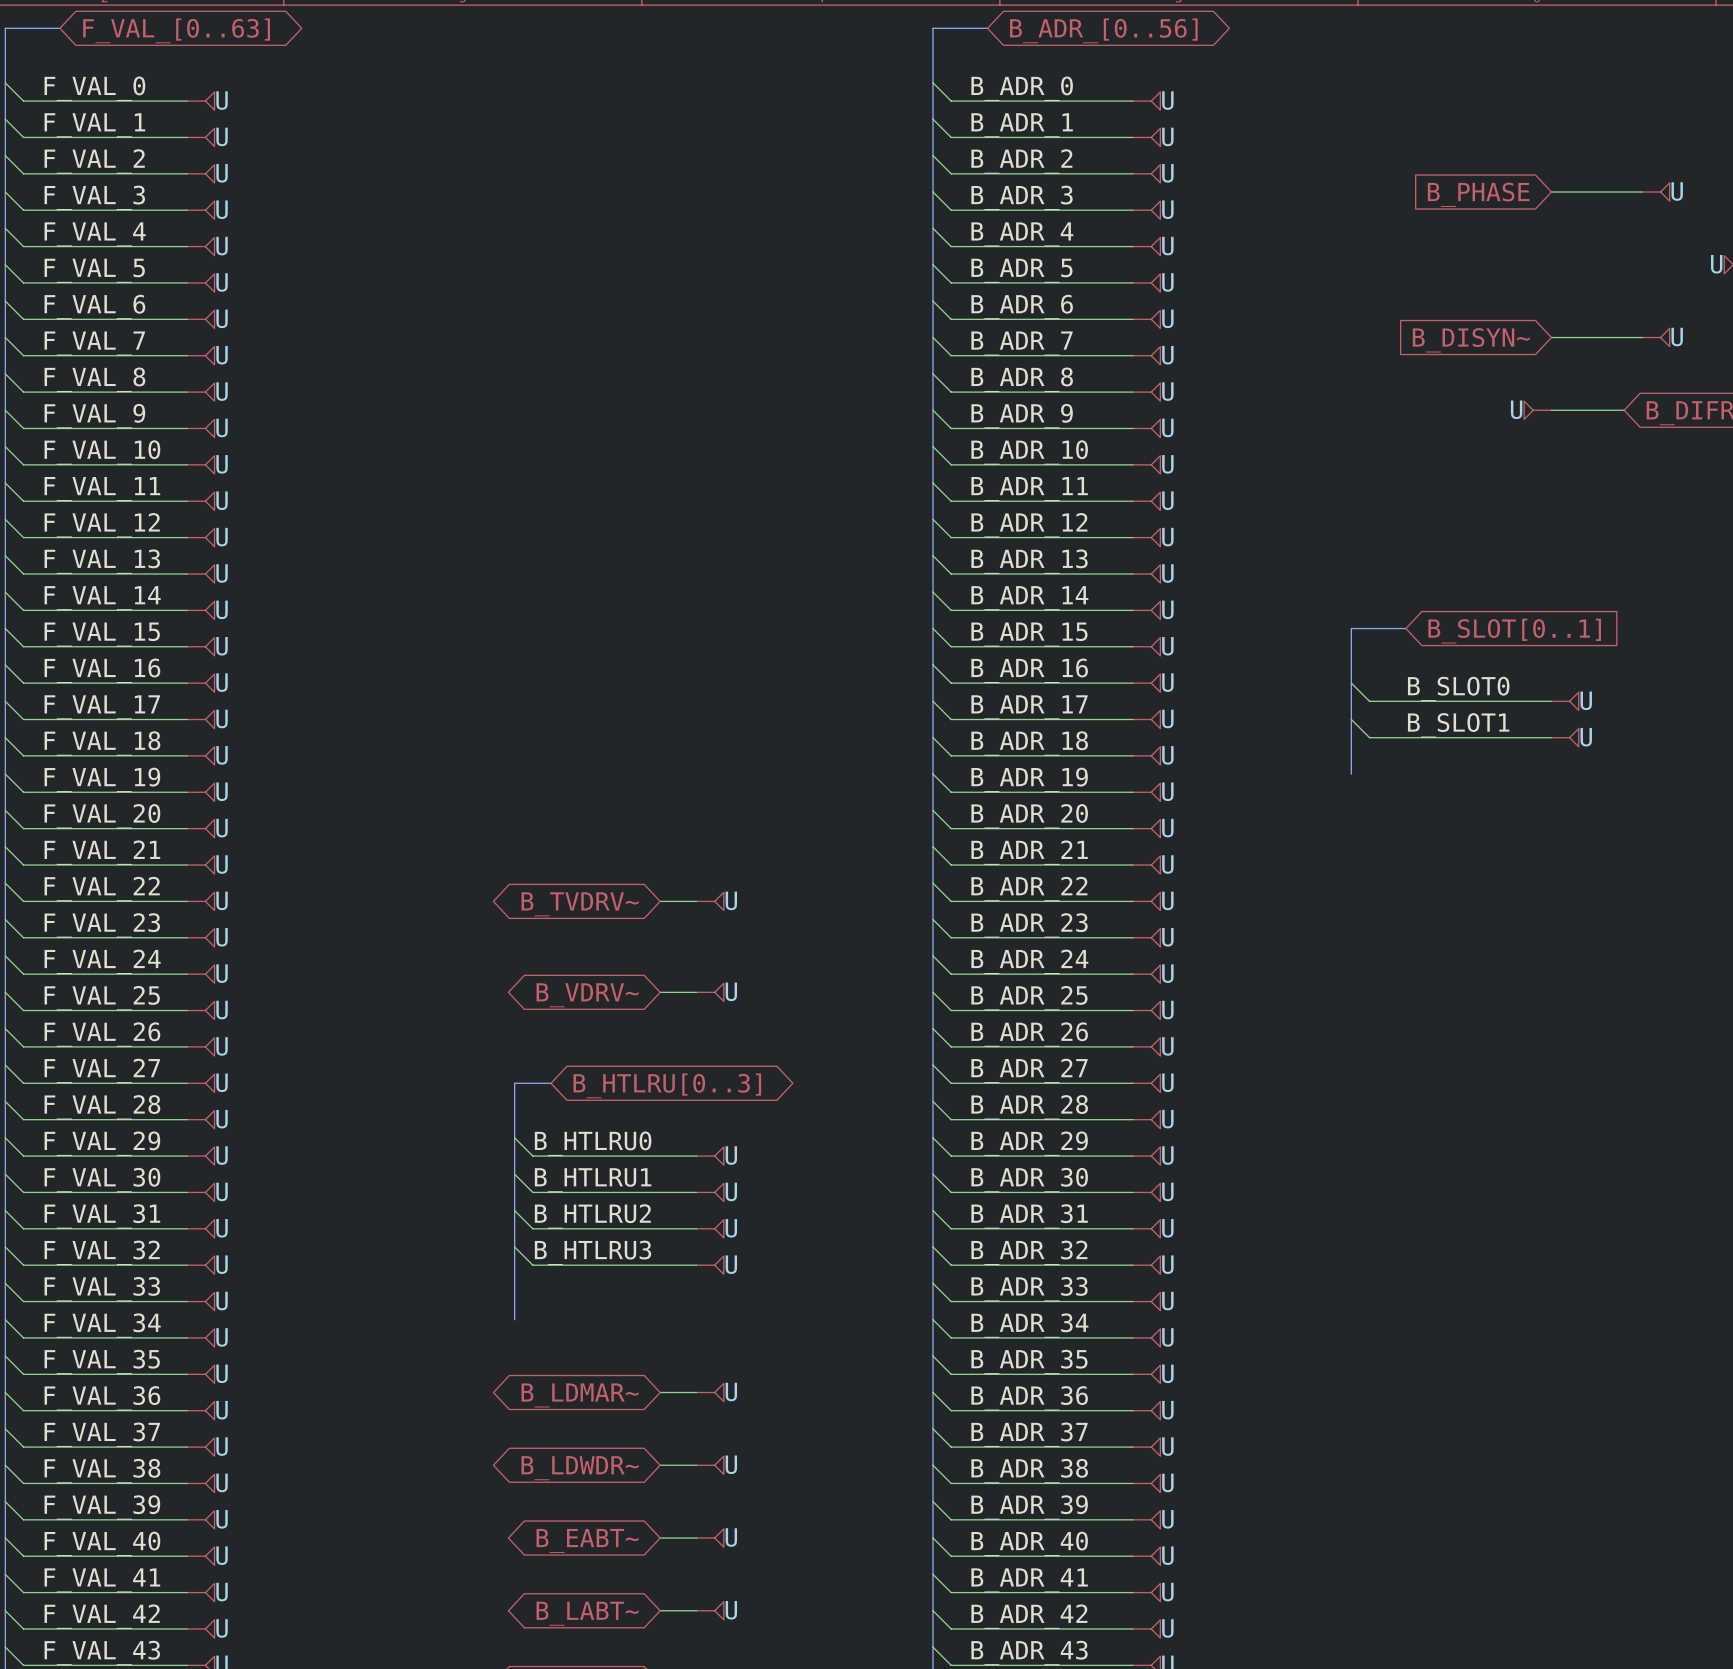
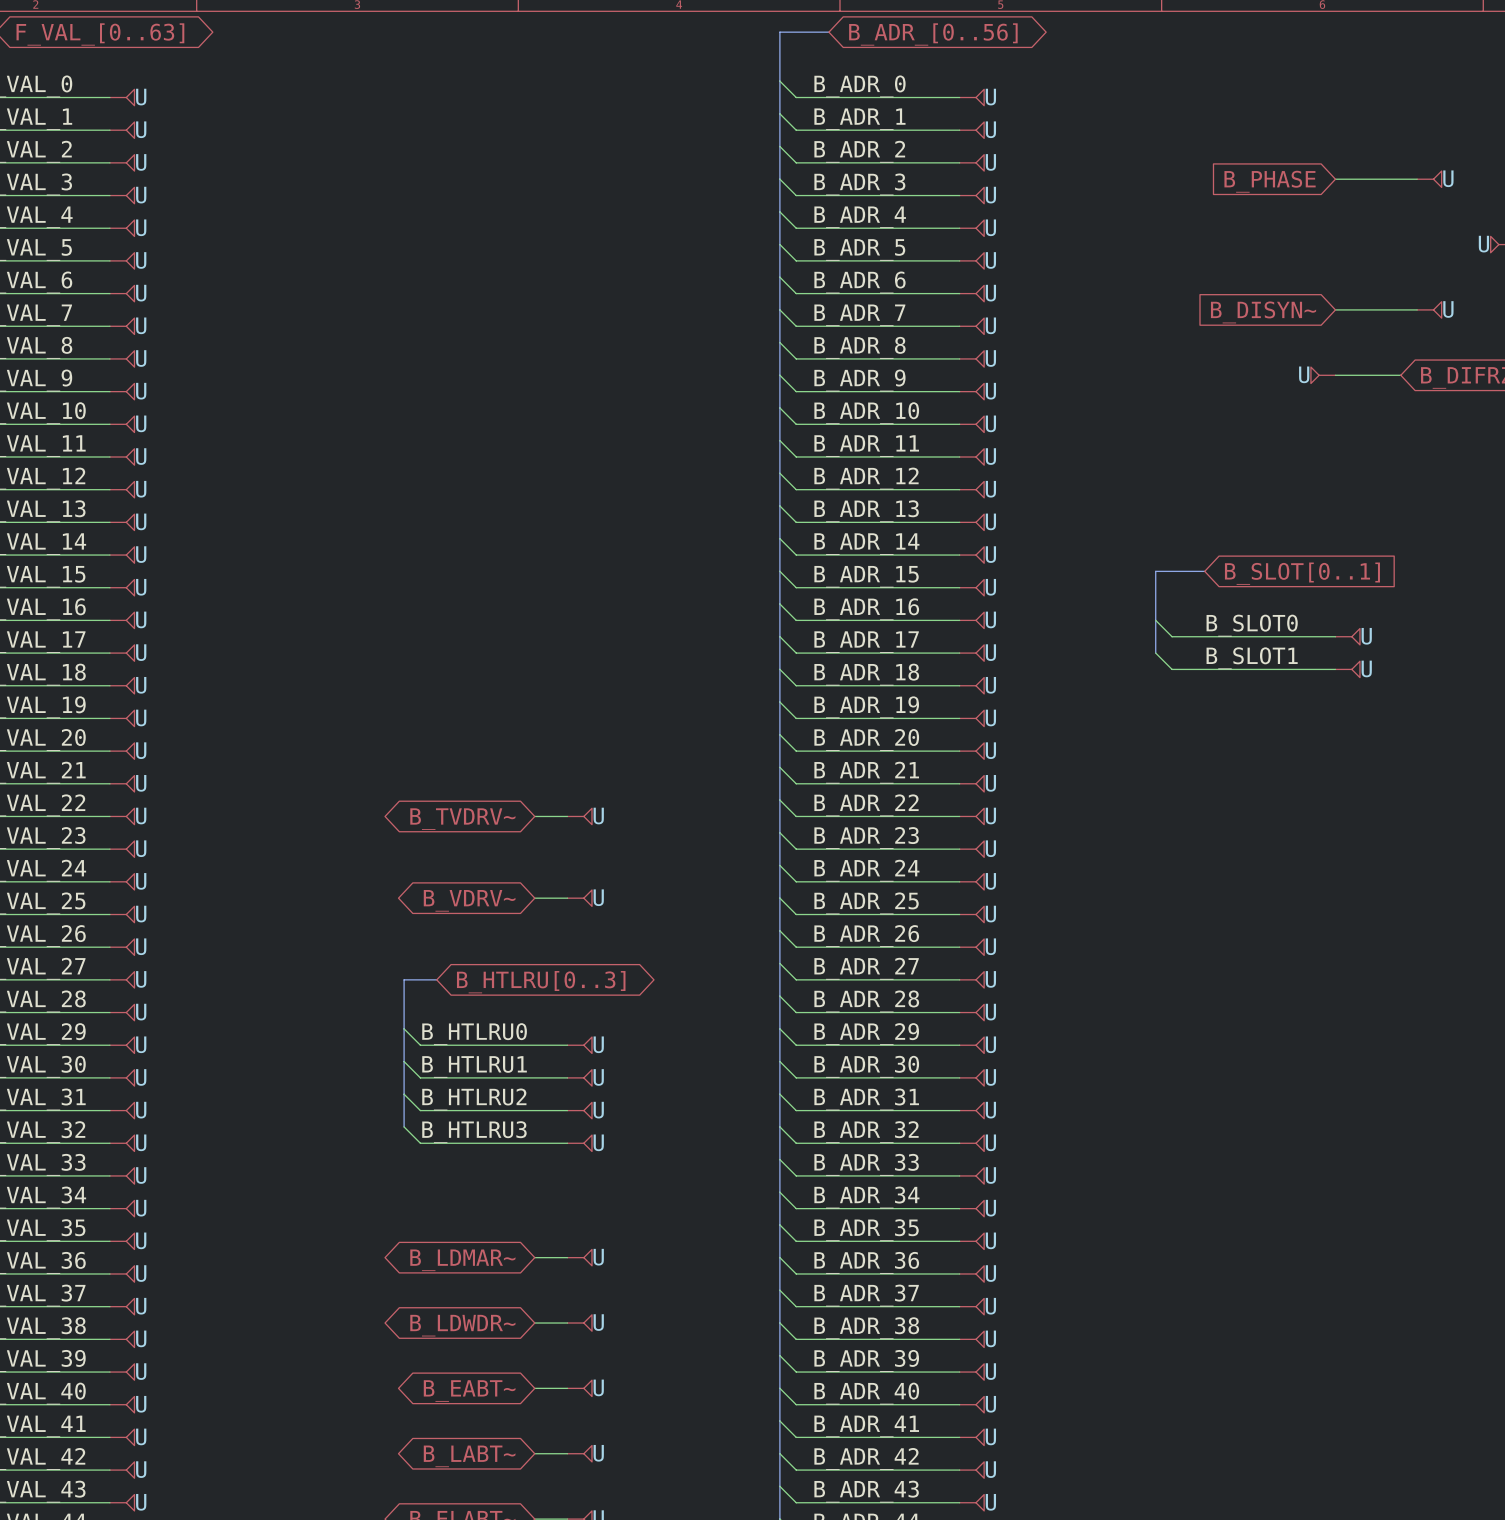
bus: (1351, 719) (1351, 774) -> none
bus: (514, 1246) (514, 1319) -> none

